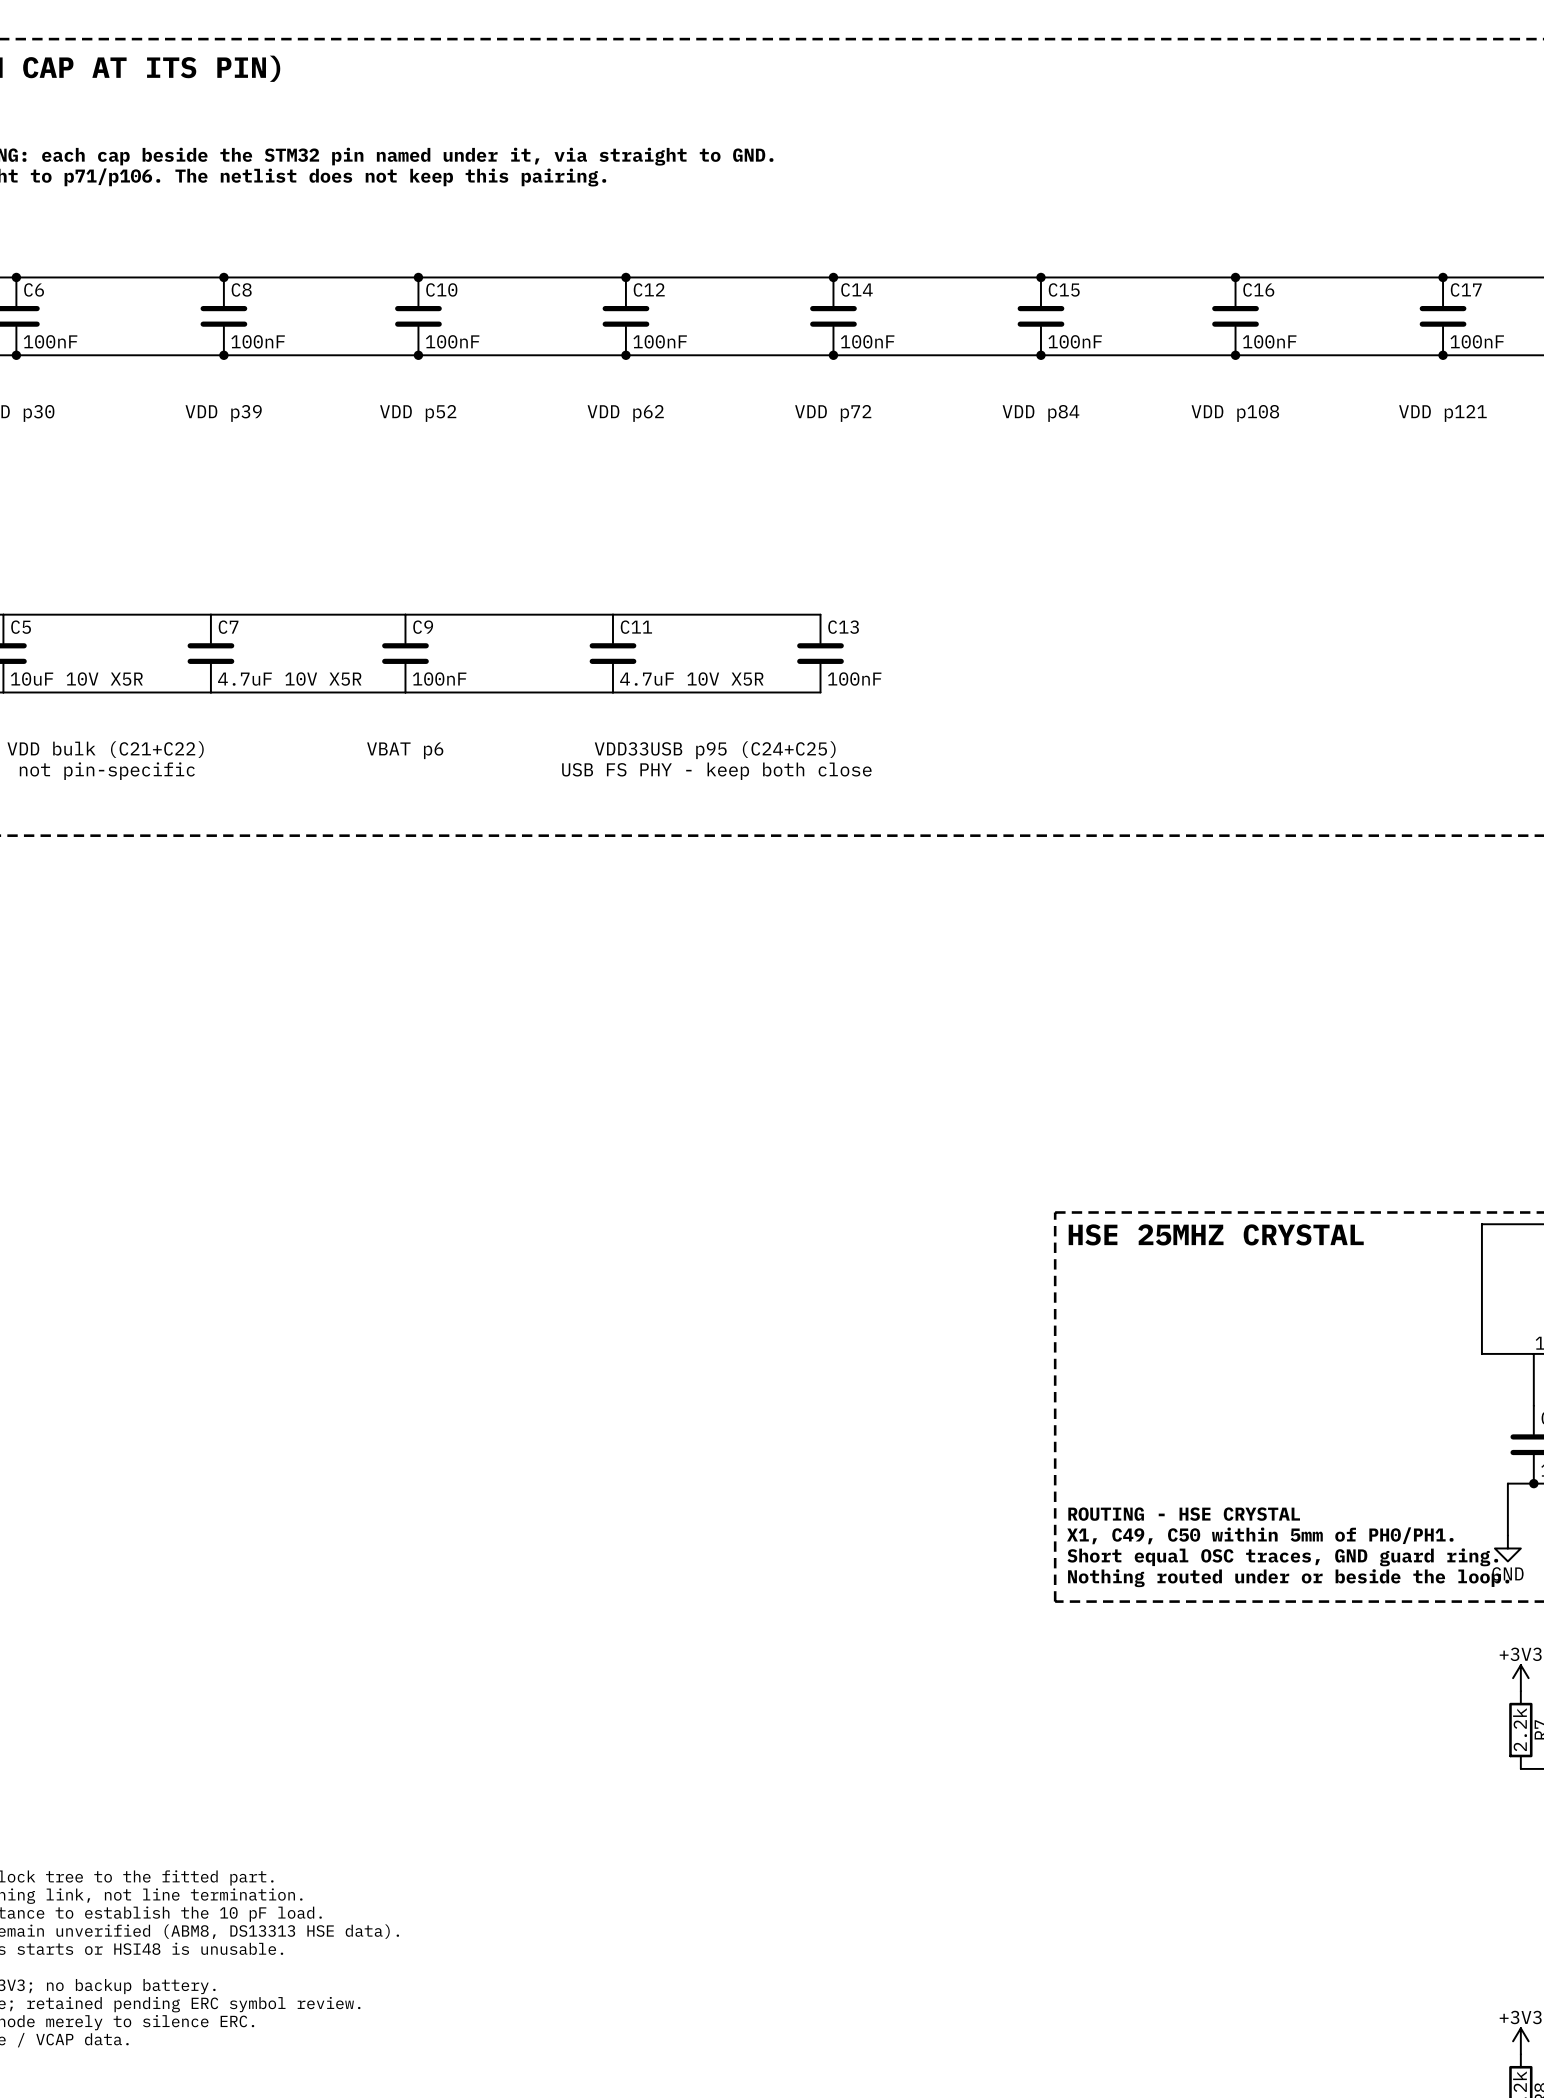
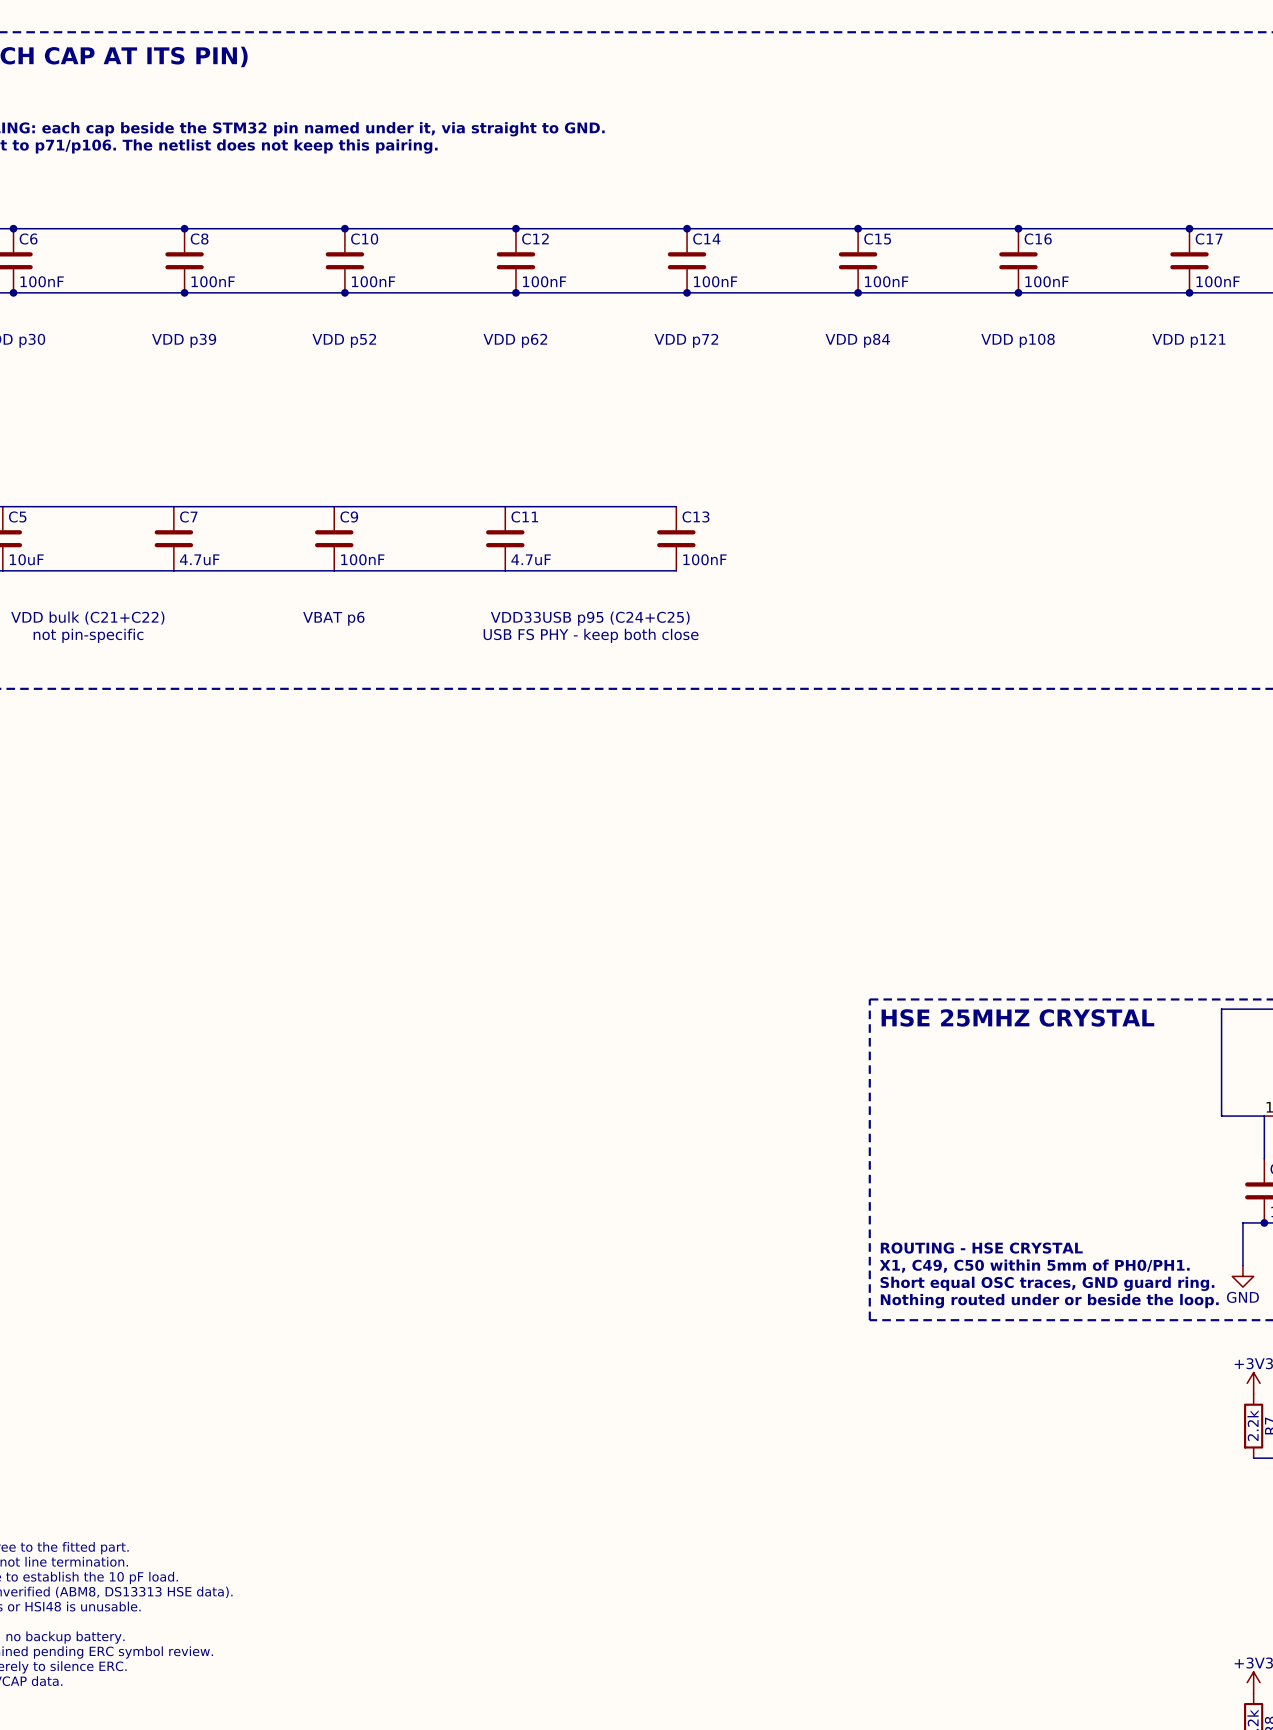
C5 value: 10uF 10V X5R (76, 679) -> 10uF (26, 559)
C7 value: 4.7uF 10V X5R (289, 679) -> 4.7uF (199, 559)
C11 value: 4.7uF 10V X5R (691, 679) -> 4.7uF (531, 559)

